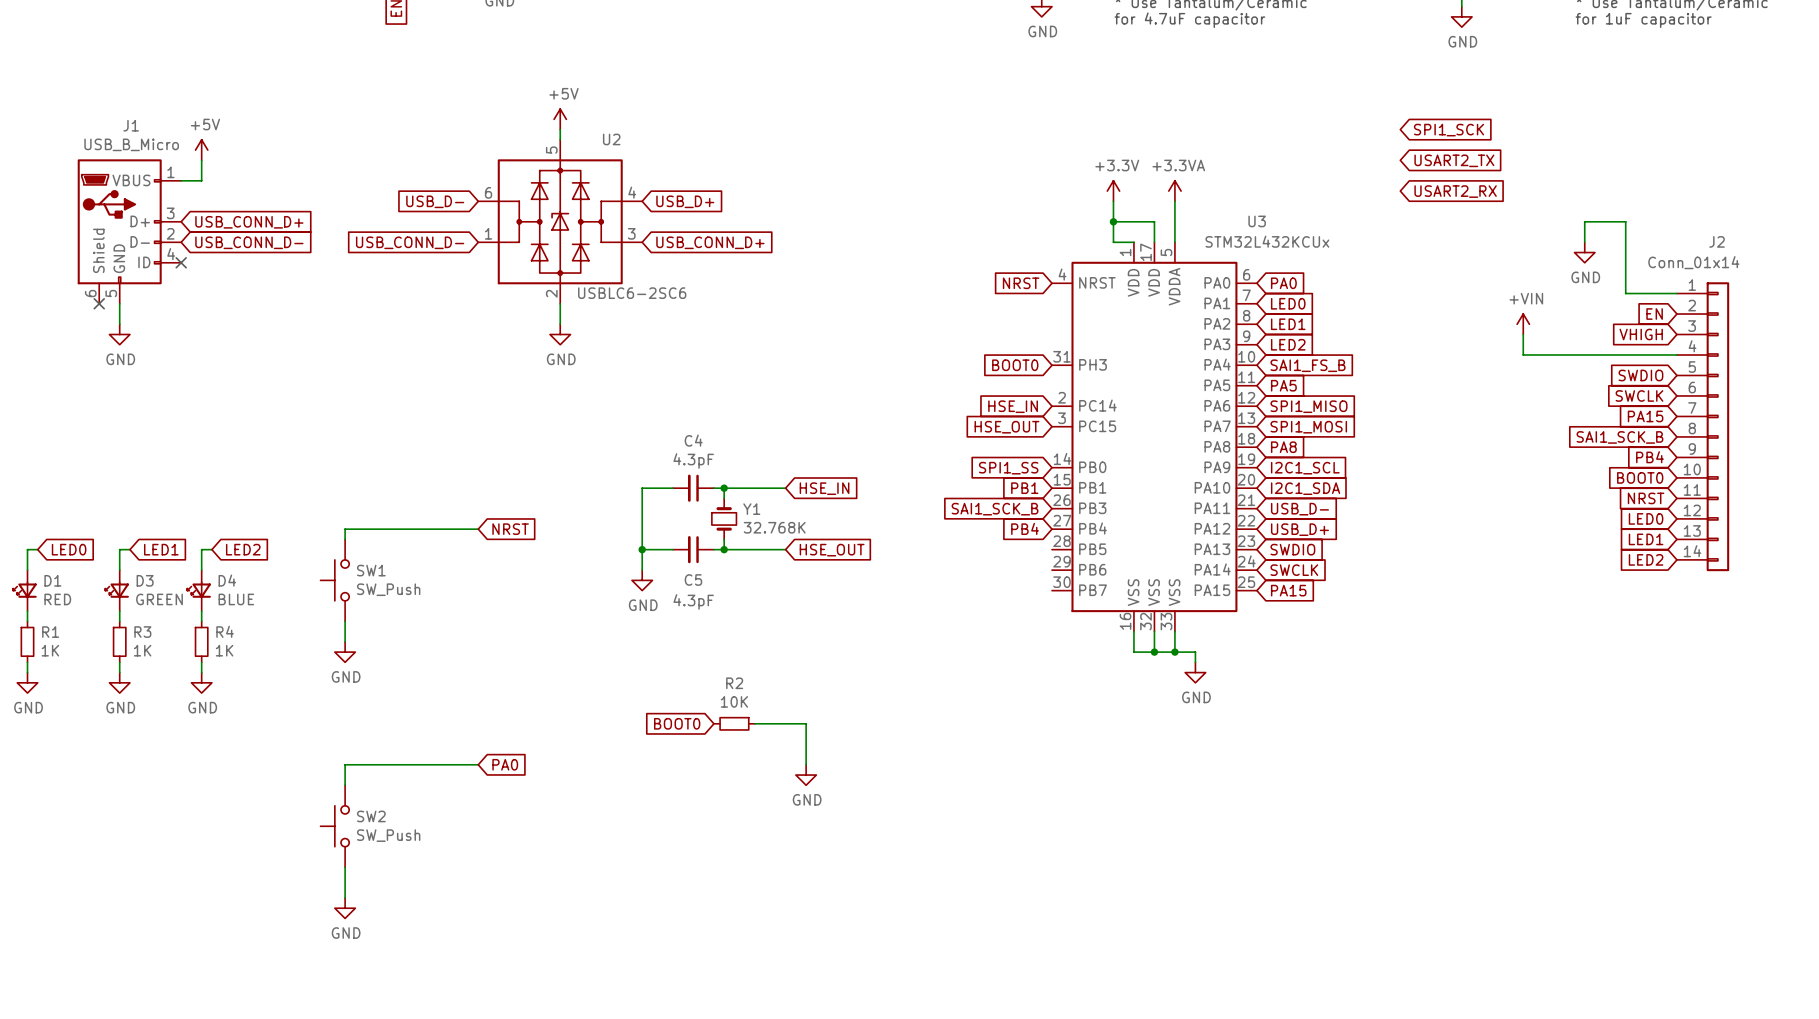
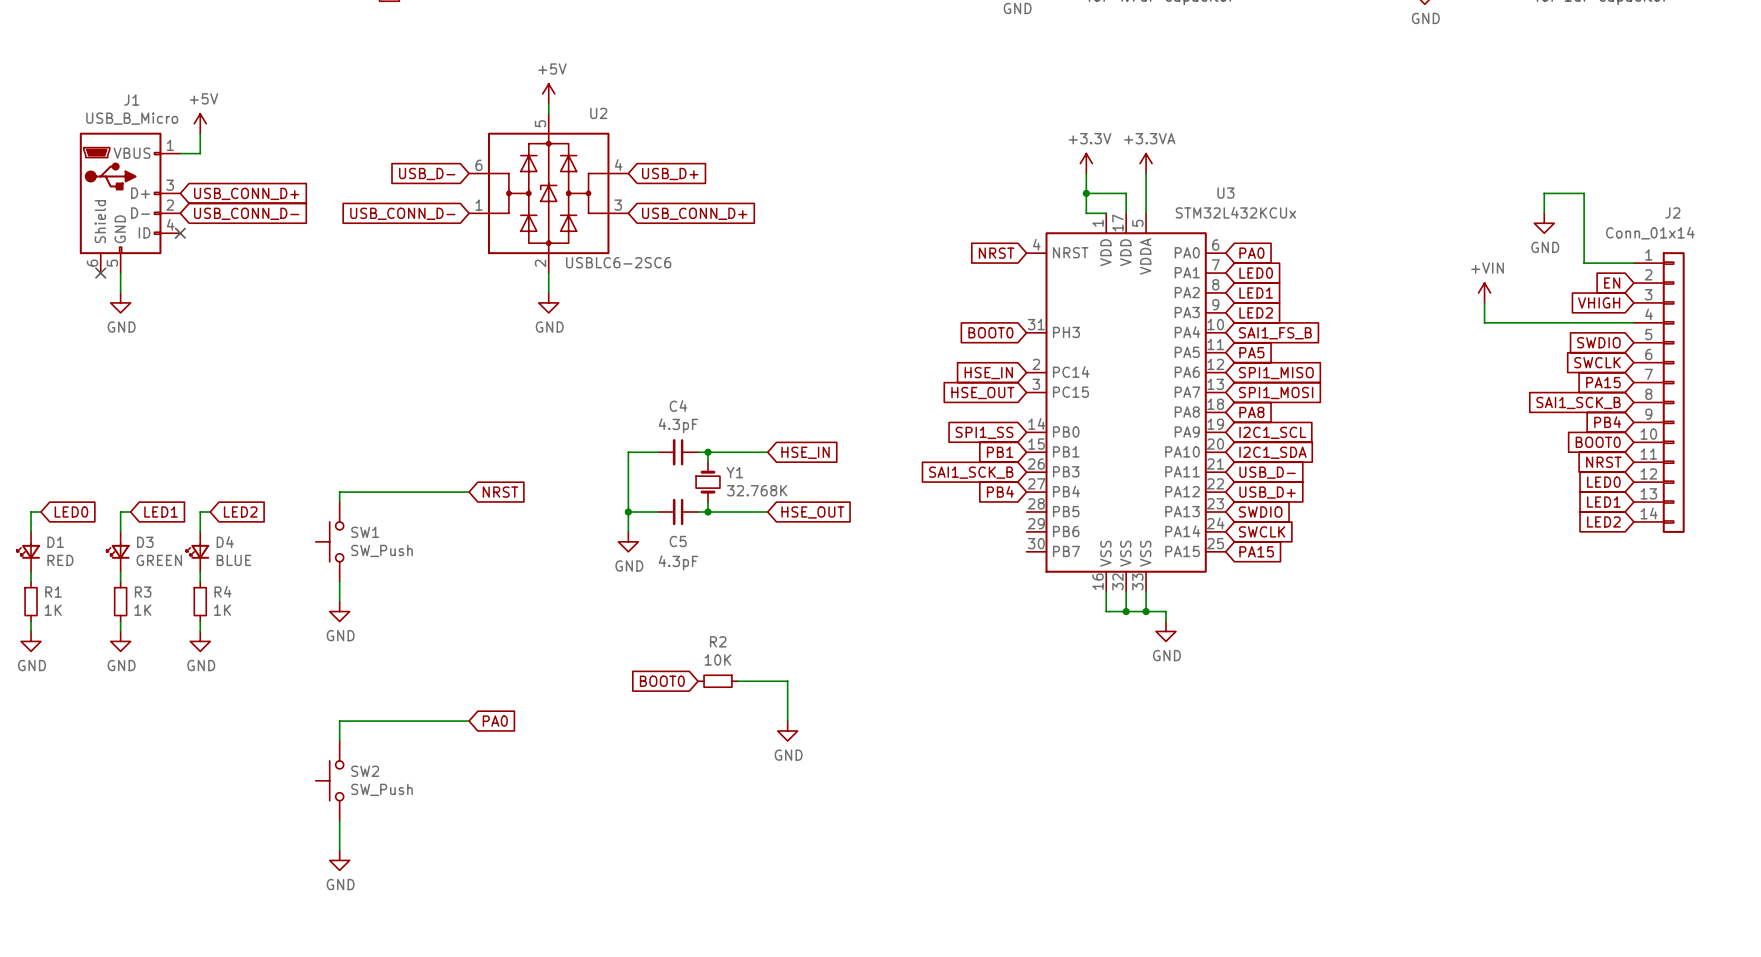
global label: SPI1_SCK (1449, 130) -> none
global label: USART2_TX (1454, 160) -> none
global label: USART2_RX (1455, 191) -> none

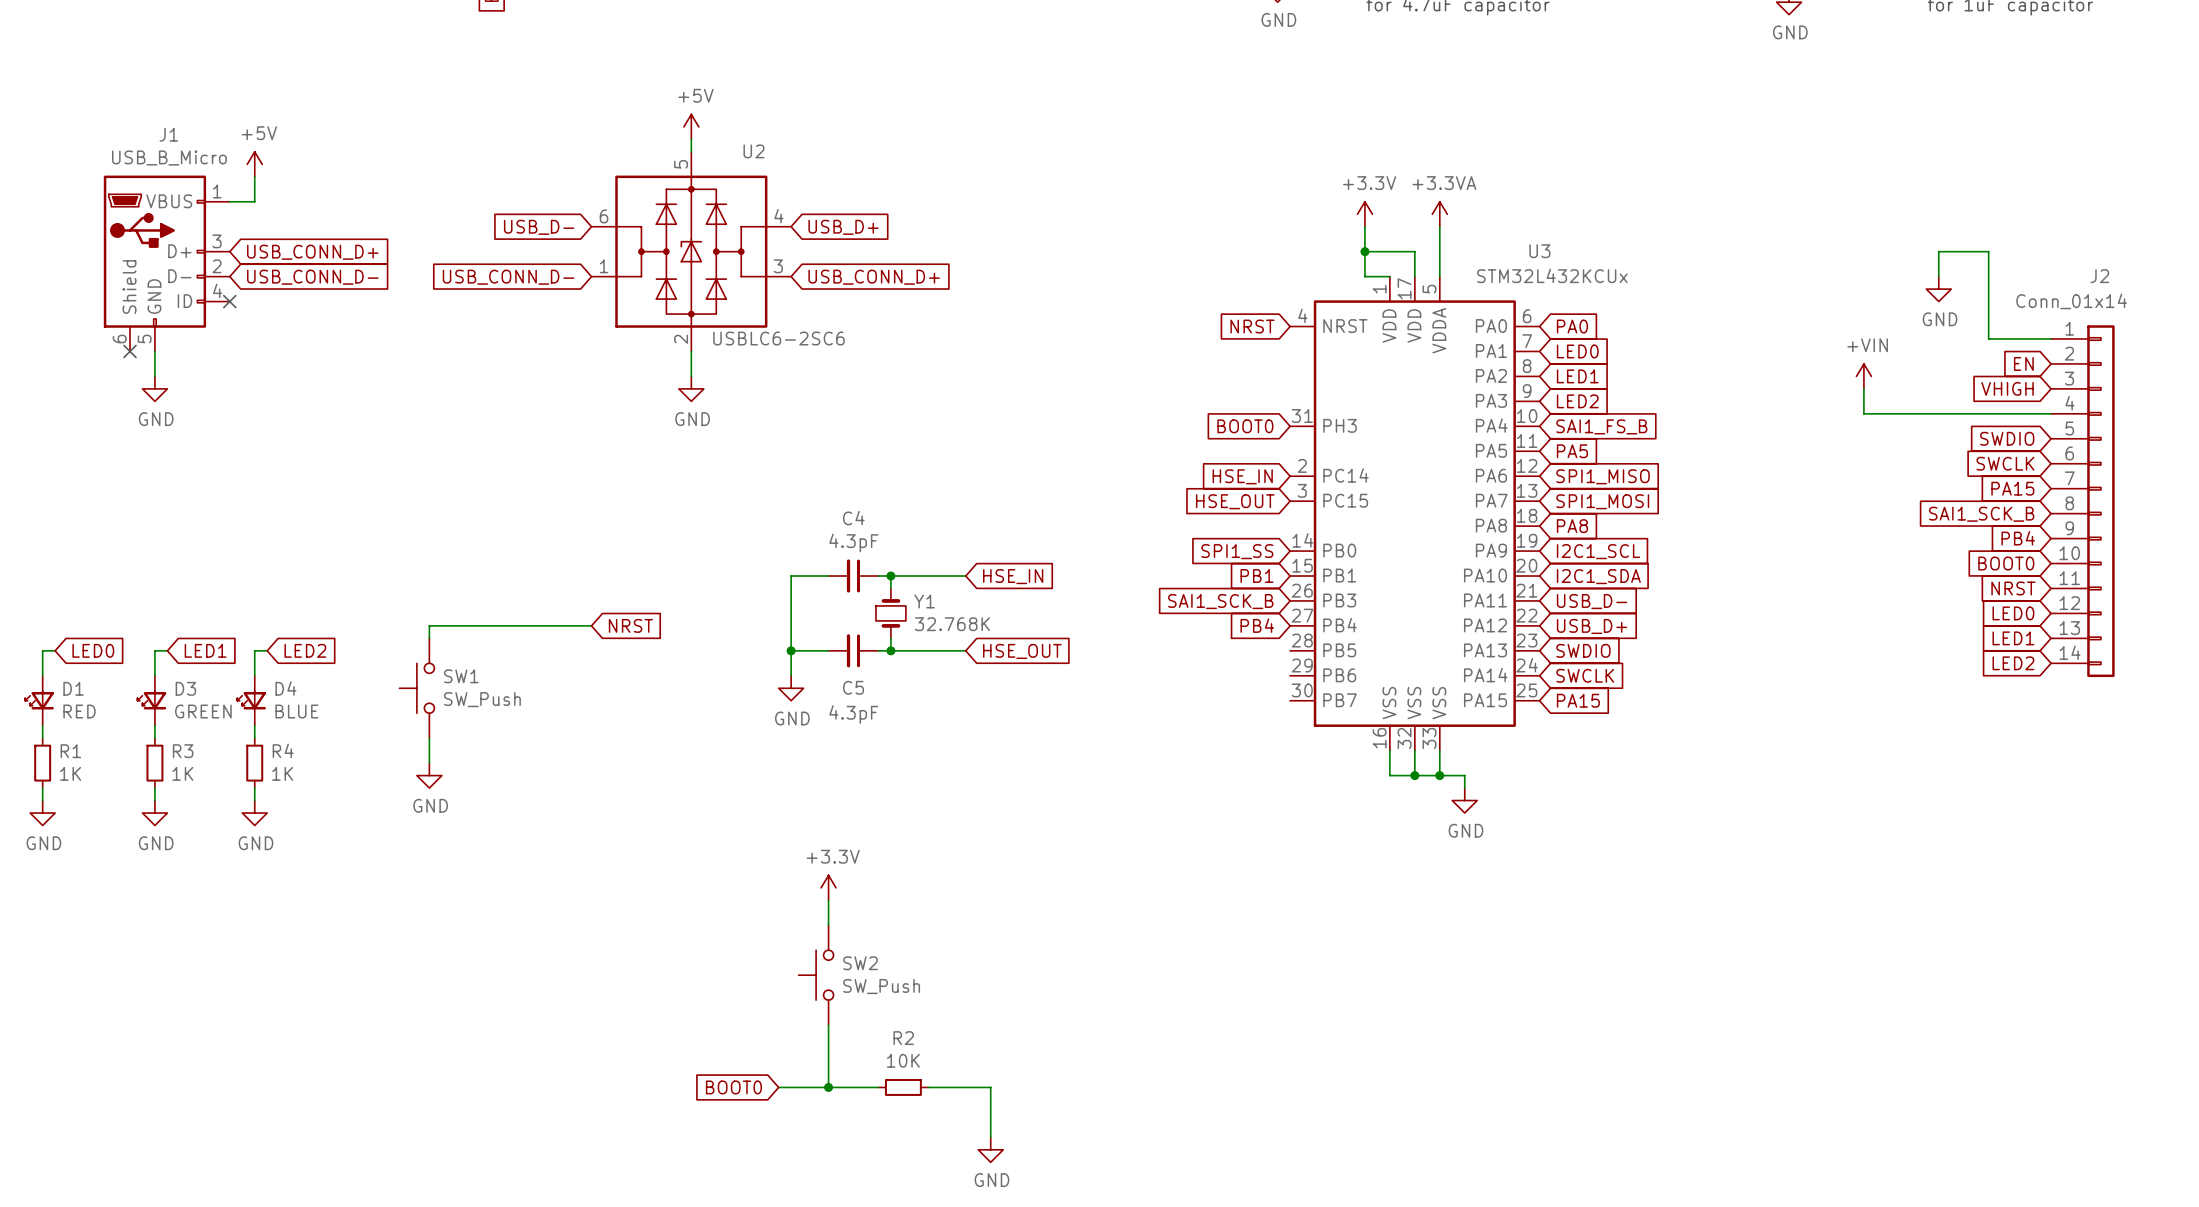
global label: BOOT0 (662, 681) -> none
R2 position: (717, 681) -> (903, 1087)
wire: (737, 681) (787, 681) (787, 721) -> (928, 1087) (990, 1087) (990, 1137)
power symbol: none -> +3.3V (828, 887)
wire: none -> (828, 900) (828, 925)
wire: (469, 721) (339, 721) (339, 740) -> none
global label: PA0 (495, 721) -> none
power symbol position: GND (787, 731) -> GND (990, 1149)
SW2 position: (329, 780) -> (816, 975)
wire: none -> (828, 1025) (828, 1087)
wire: (339, 820) (339, 850) -> none
power symbol: GND (339, 860) -> none
global label: none -> BOOT0 (733, 1087)
wire: none -> (778, 1087) (878, 1087)
junction: none -> (828, 1087)

